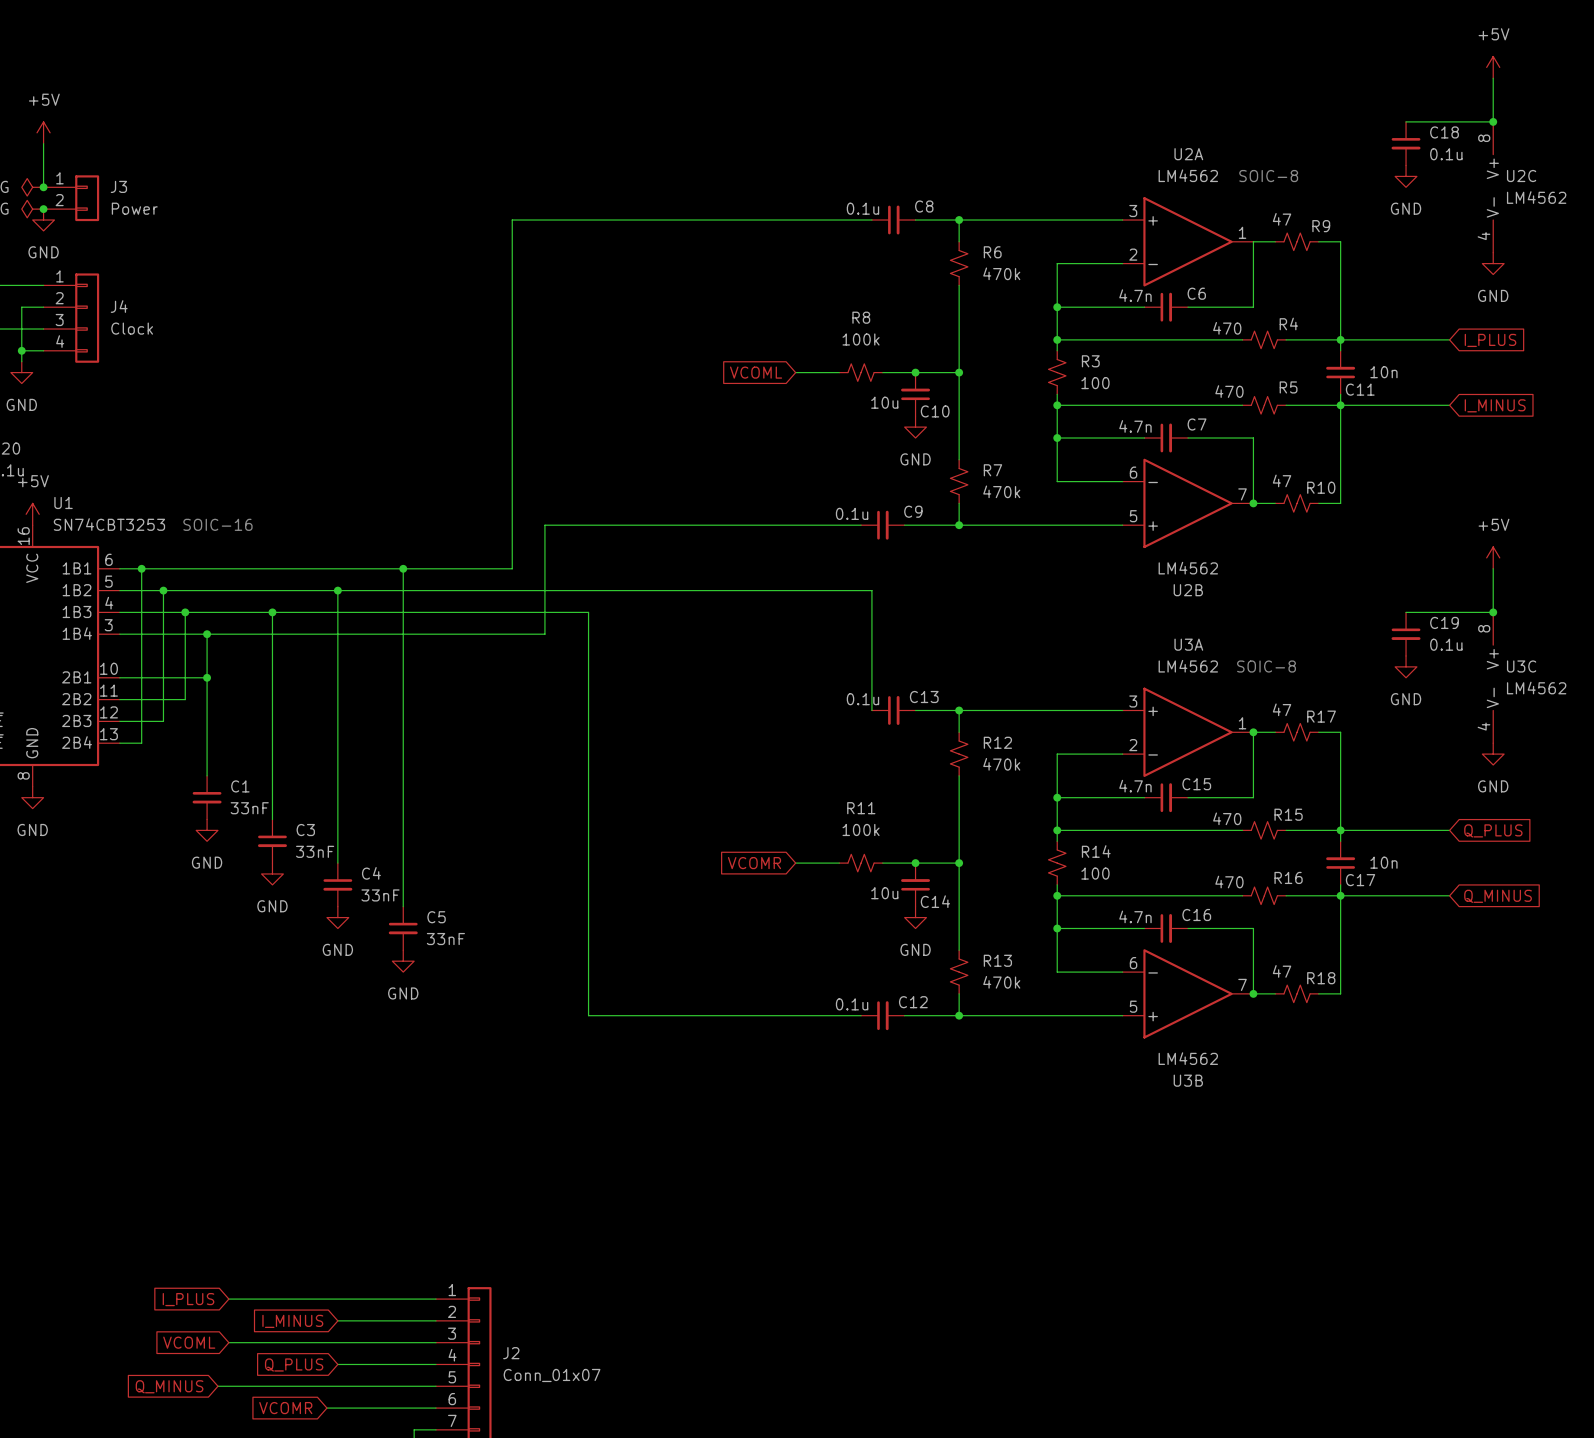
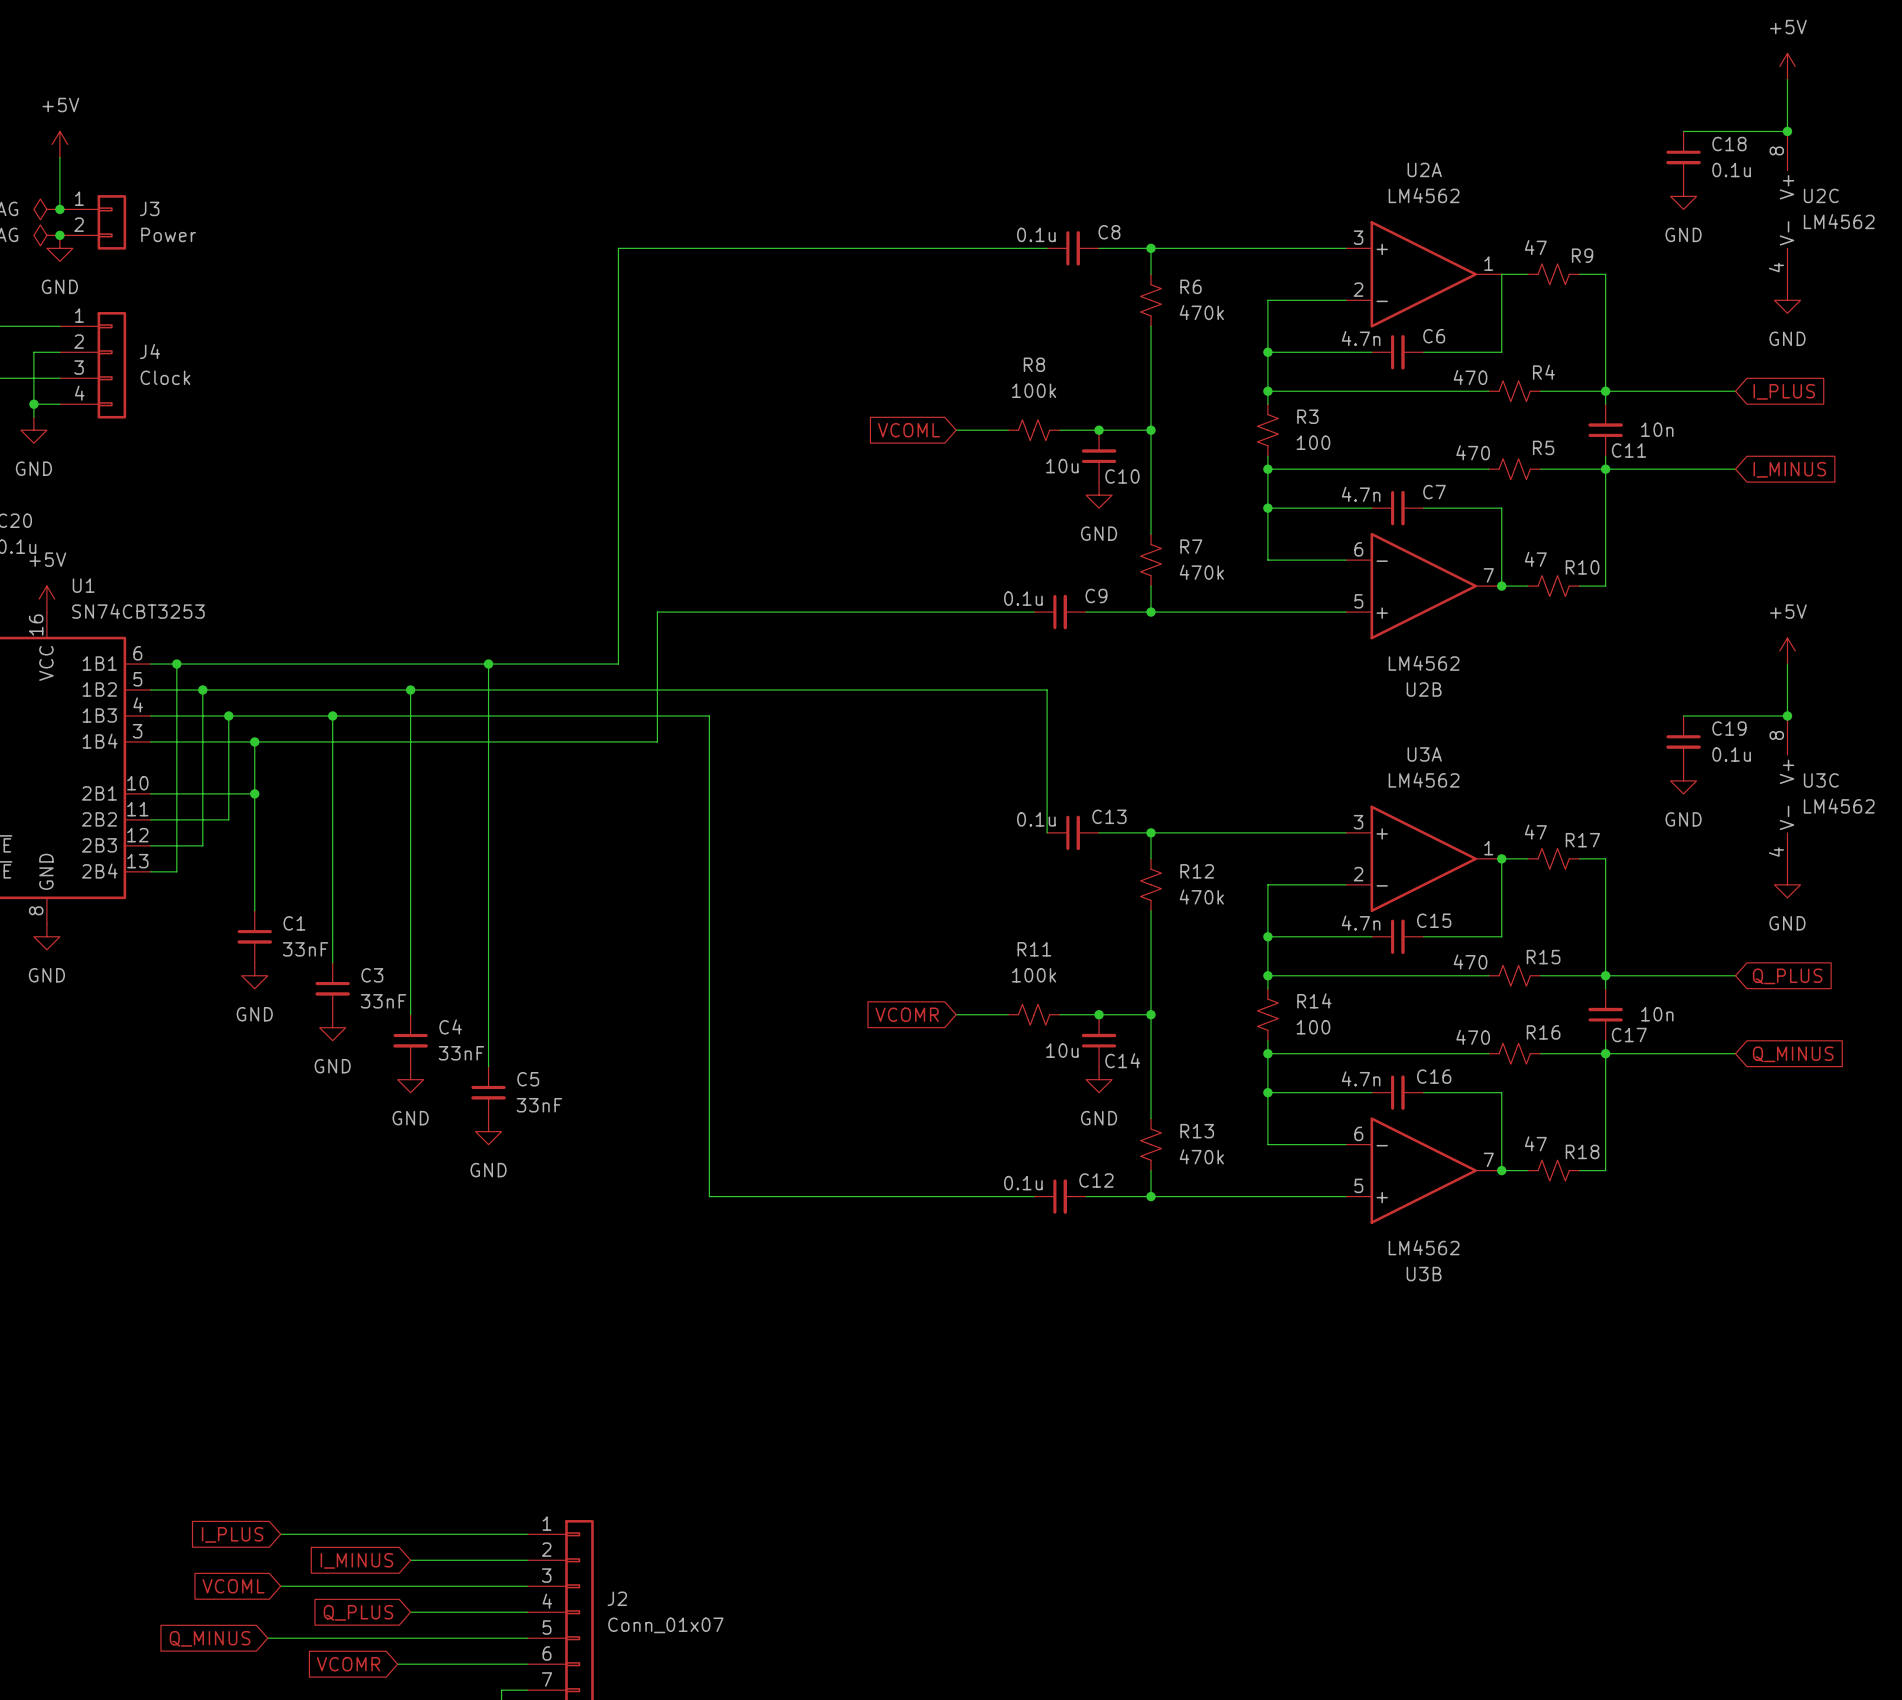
text: SOIC-8 (1268, 176) -> none
text: SOIC-16 (217, 524) -> none
text: SOIC-8 (1266, 666) -> none

